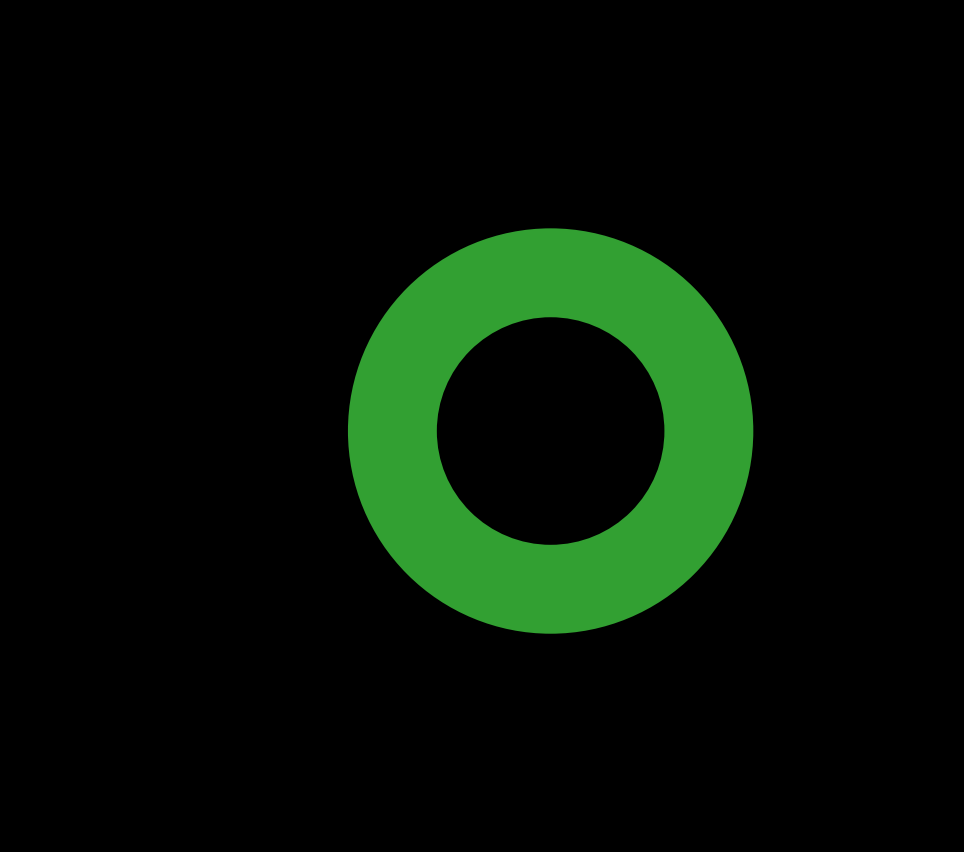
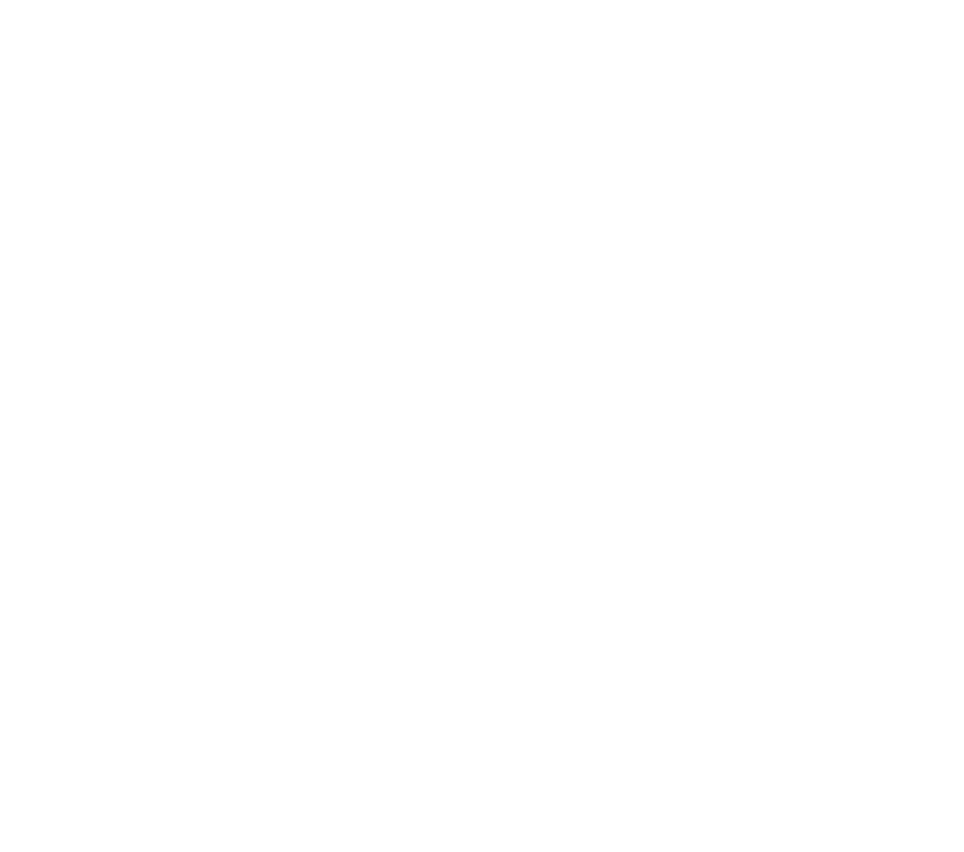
part: (550, 431) -> none

